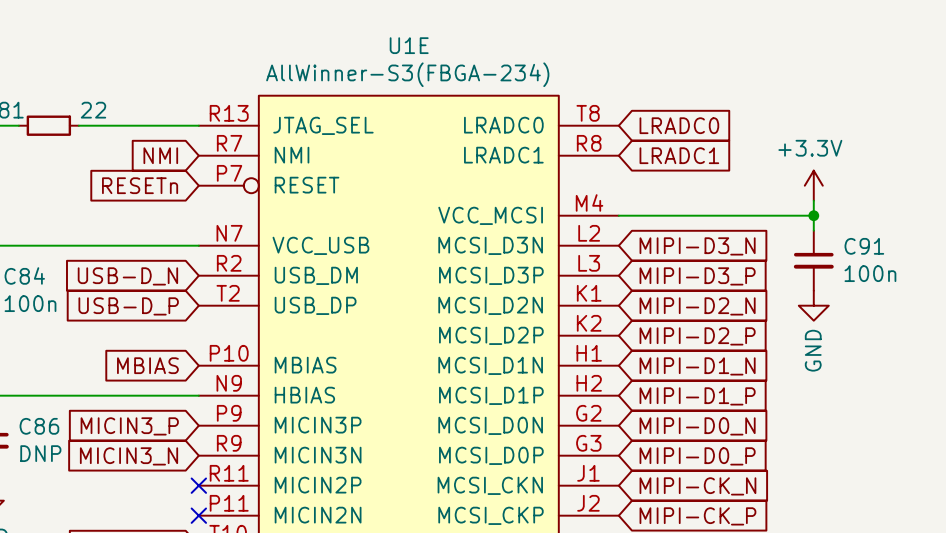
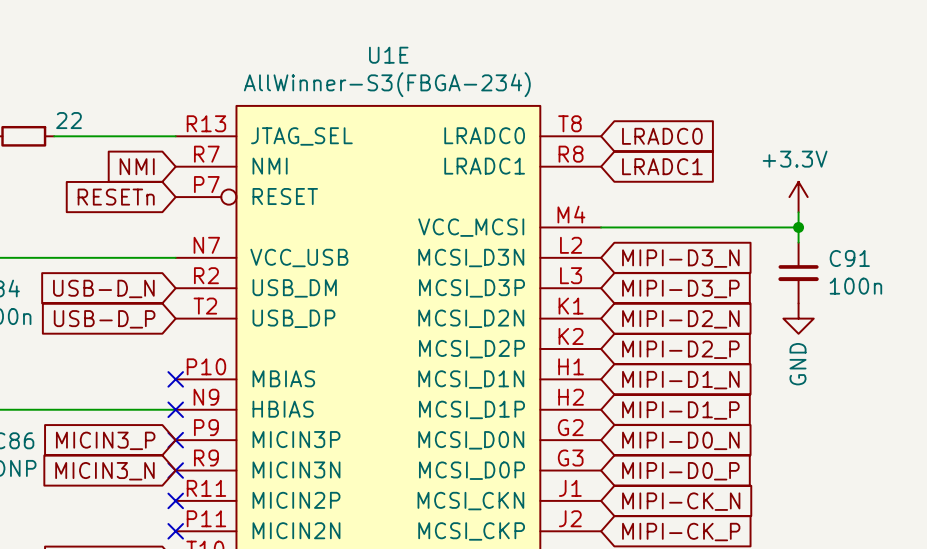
global label: MBIAS (147, 365) -> none
no-connect mark: none -> (175, 379)
no-connect mark: none -> (175, 409)
no-connect mark: none -> (175, 440)
no-connect mark: none -> (175, 470)

